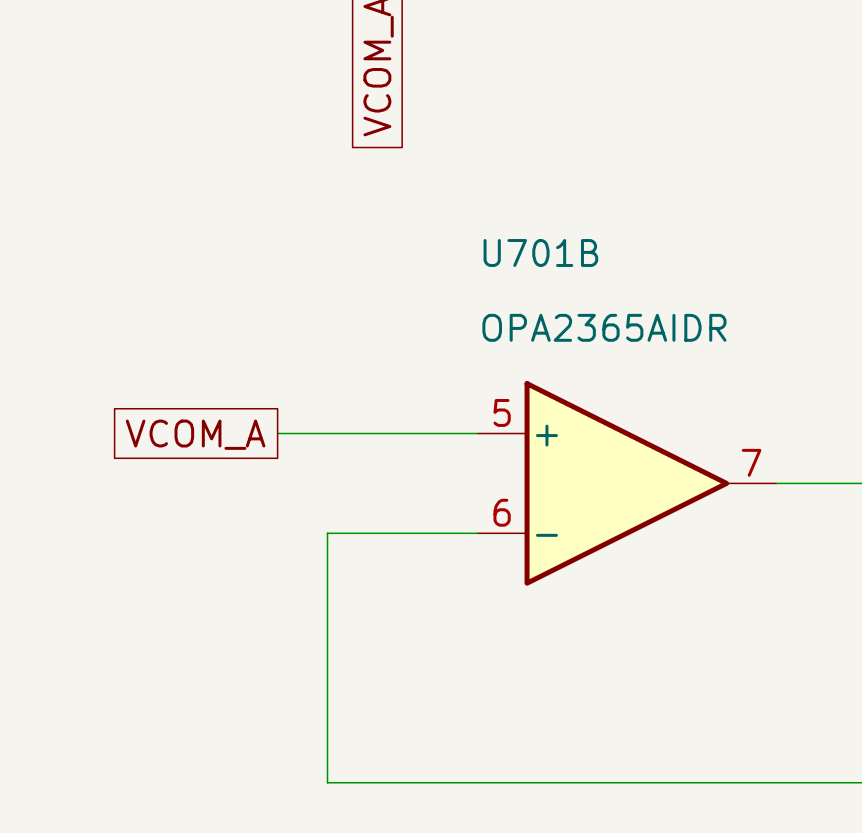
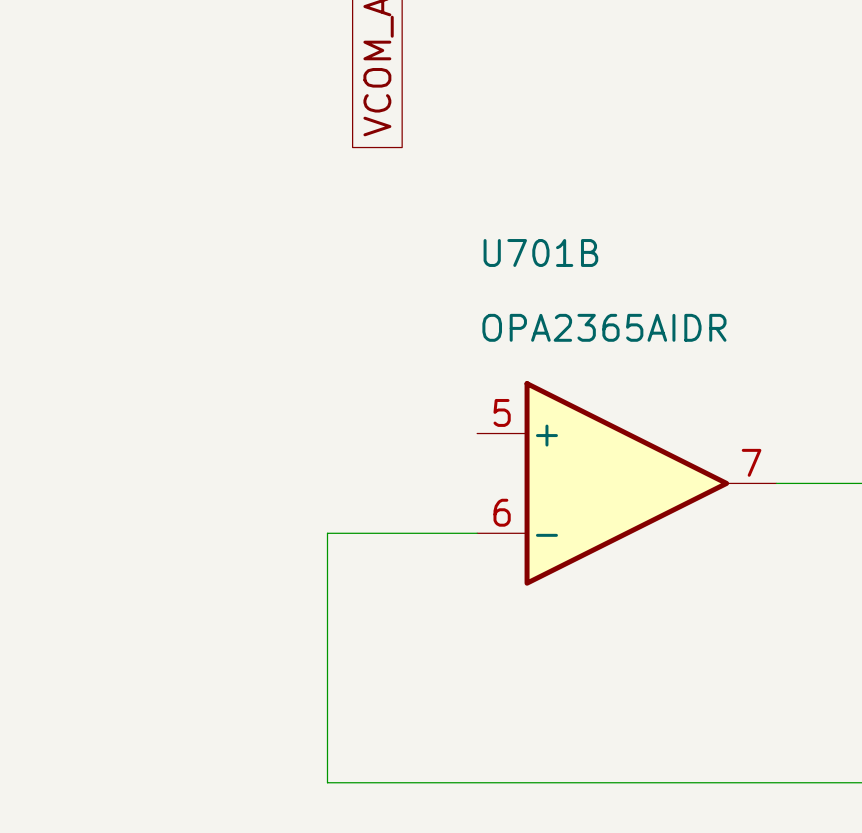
wire: (277, 433) (477, 433) -> none
global label: VCOM_A (195, 434) -> none

